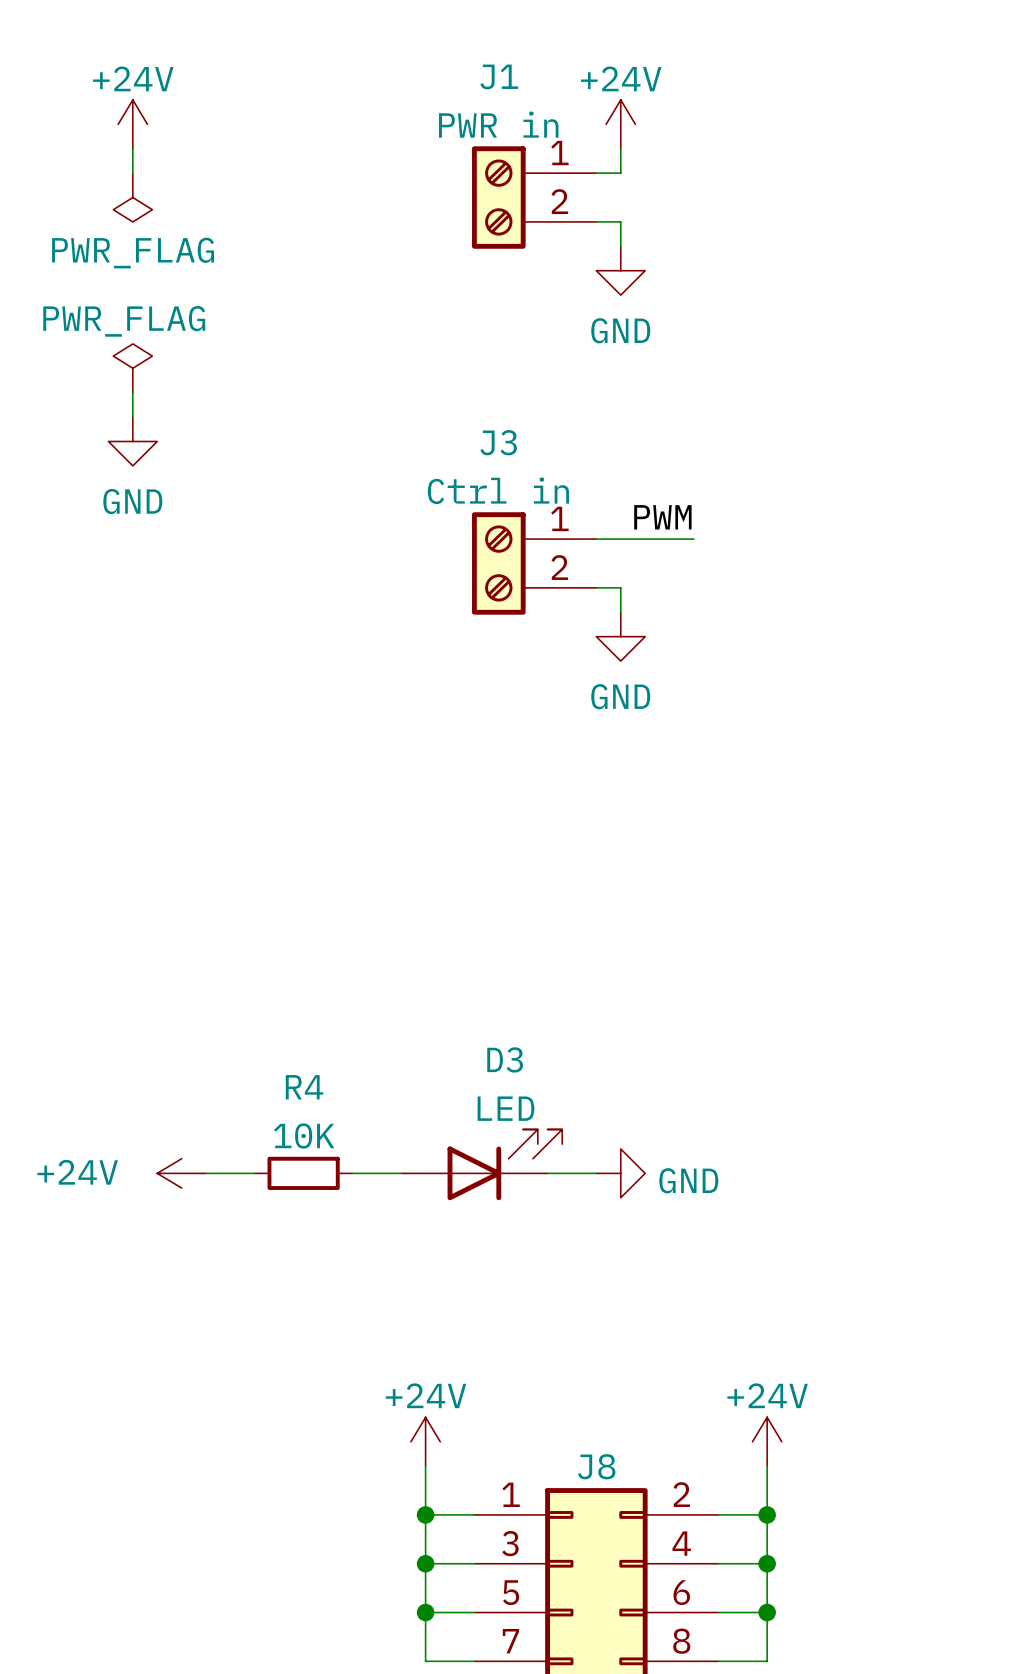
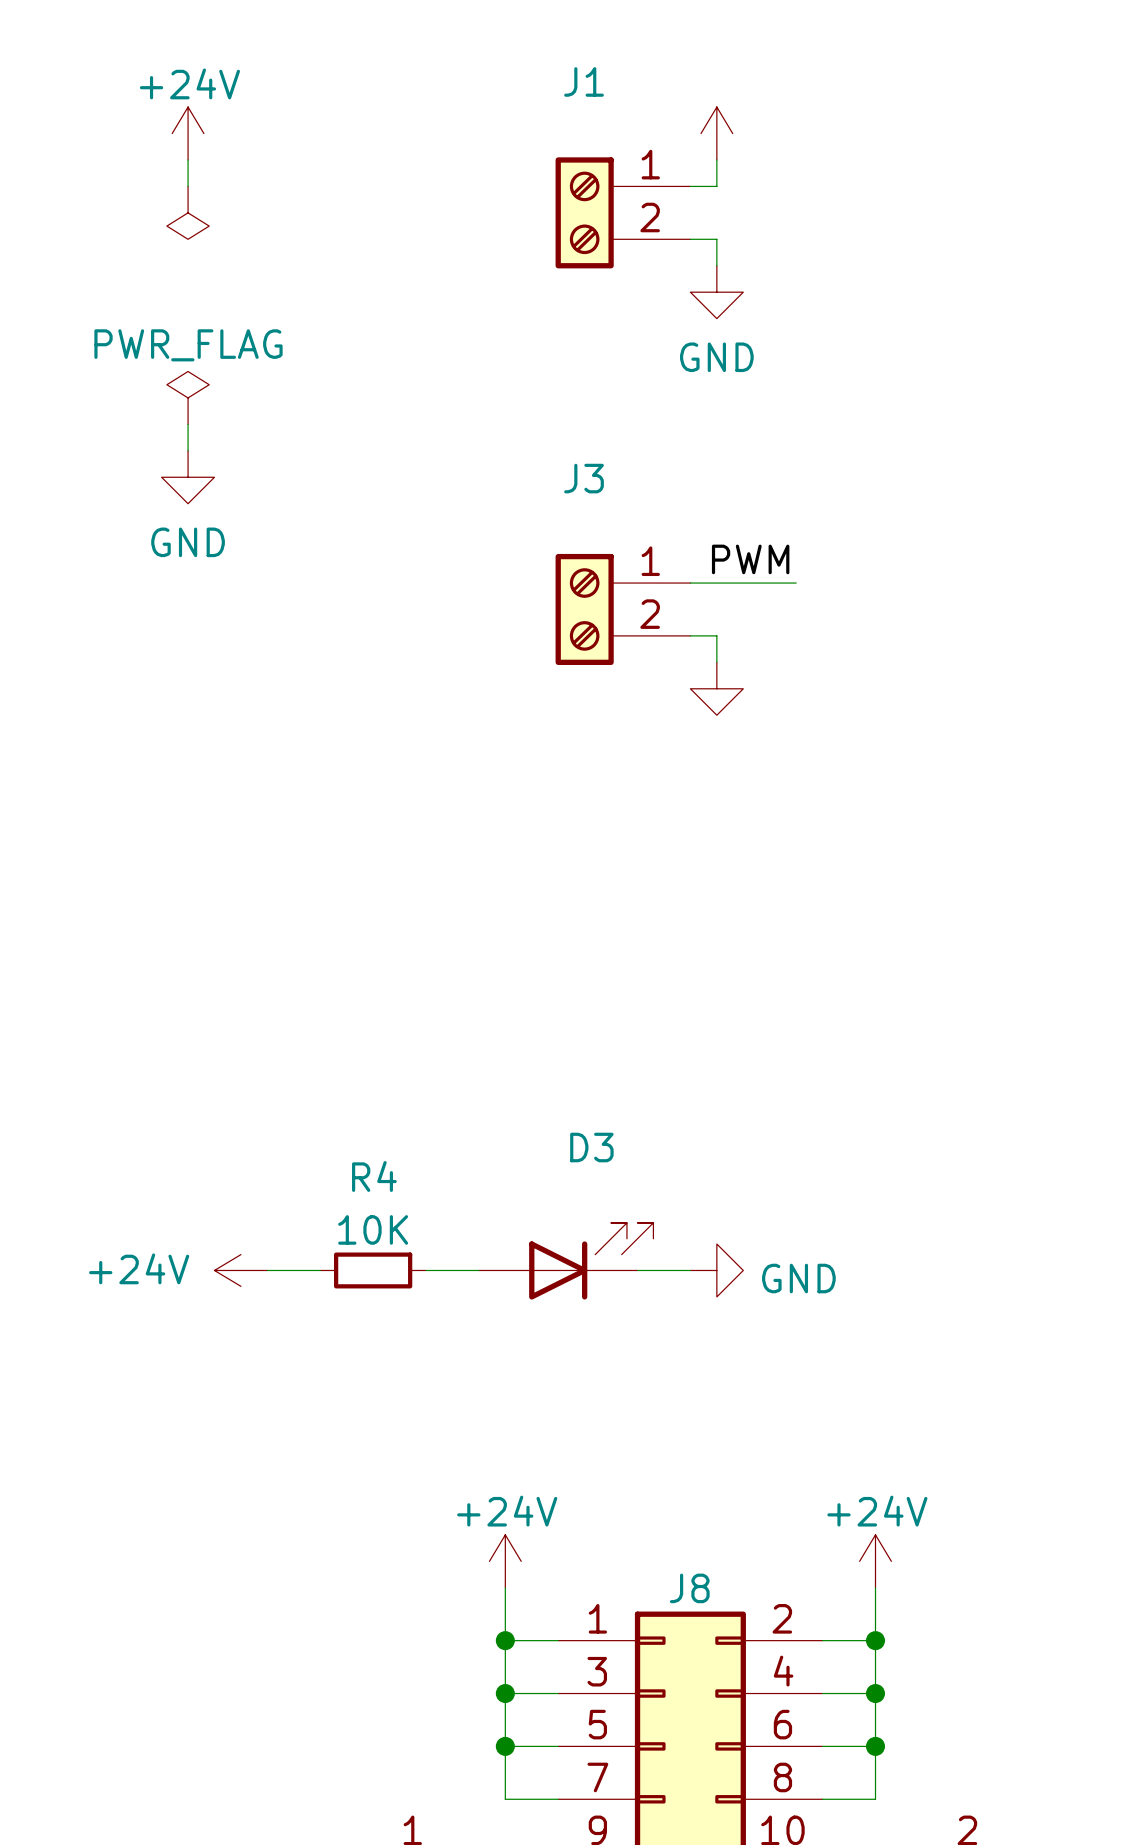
power symbol text: +24V (621, 78) -> none
J1 value: PWR in (498, 124) -> none
power symbol text: PWR_FLAG (133, 253) -> none
J3 value: Ctrl in (498, 490) -> none
power symbol text: GND (620, 696) -> none
D3 value: LED (506, 1108) -> none

